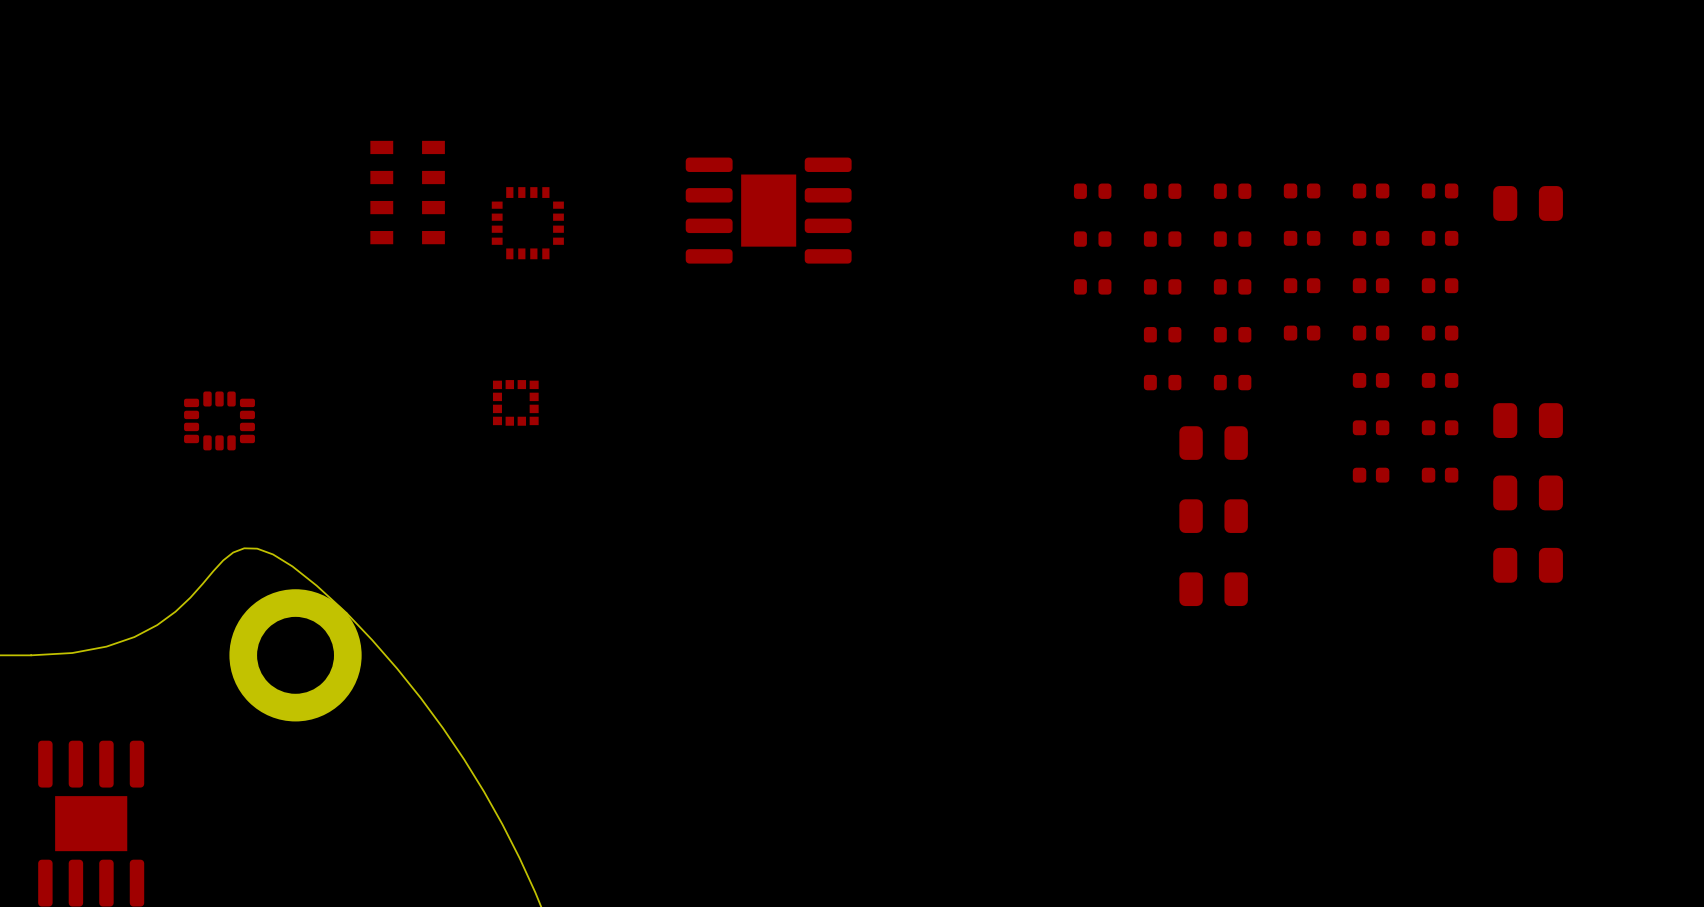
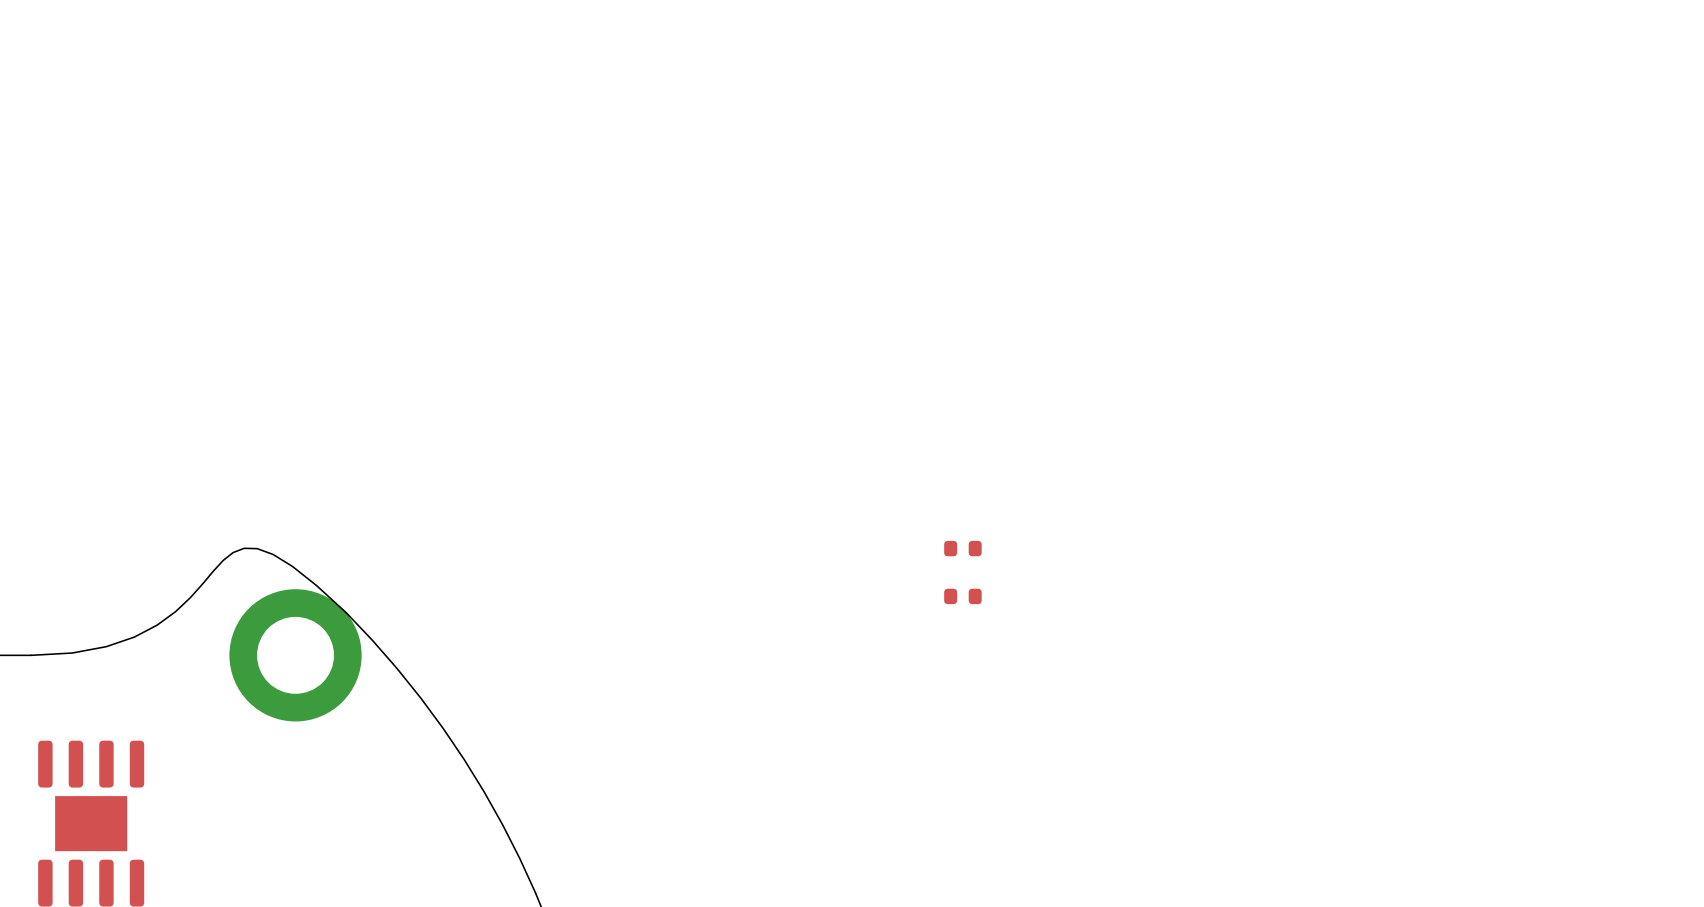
part: (1302, 190) -> none
part: (1371, 190) -> none
part: (1440, 190) -> none
part: (1092, 191) -> none
part: (1162, 191) -> none
part: (1232, 191) -> none
part: (407, 192) -> none
part: (1528, 203) -> none
part: (768, 210) -> none
part: (527, 223) -> none
part: (1302, 238) -> none
part: (1371, 238) -> none
part: (1440, 238) -> none
part: (1092, 239) -> none
part: (1162, 239) -> none
part: (1232, 239) -> none
part: (1302, 285) -> none
part: (1371, 285) -> none
part: (1440, 285) -> none
part: (1092, 286) -> none
part: (1162, 286) -> none
part: (1232, 286) -> none
part: (1302, 333) -> none
part: (1371, 333) -> none
part: (1440, 333) -> none
part: (1162, 334) -> none
part: (1232, 334) -> none
part: (1371, 380) -> none
part: (1440, 380) -> none
part: (1162, 382) -> none
part: (1232, 382) -> none
part: (515, 402) -> none
part: (219, 420) -> none
part: (1528, 420) -> none
part: (1371, 427) -> none
part: (1440, 427) -> none
part: (1213, 443) -> none
part: (1371, 475) -> none
part: (1440, 475) -> none
part: (1528, 492) -> none
part: (1213, 516) -> none
part: none -> (962, 548)
part: (1528, 565) -> none
part: (1213, 589) -> none
part: none -> (962, 596)

